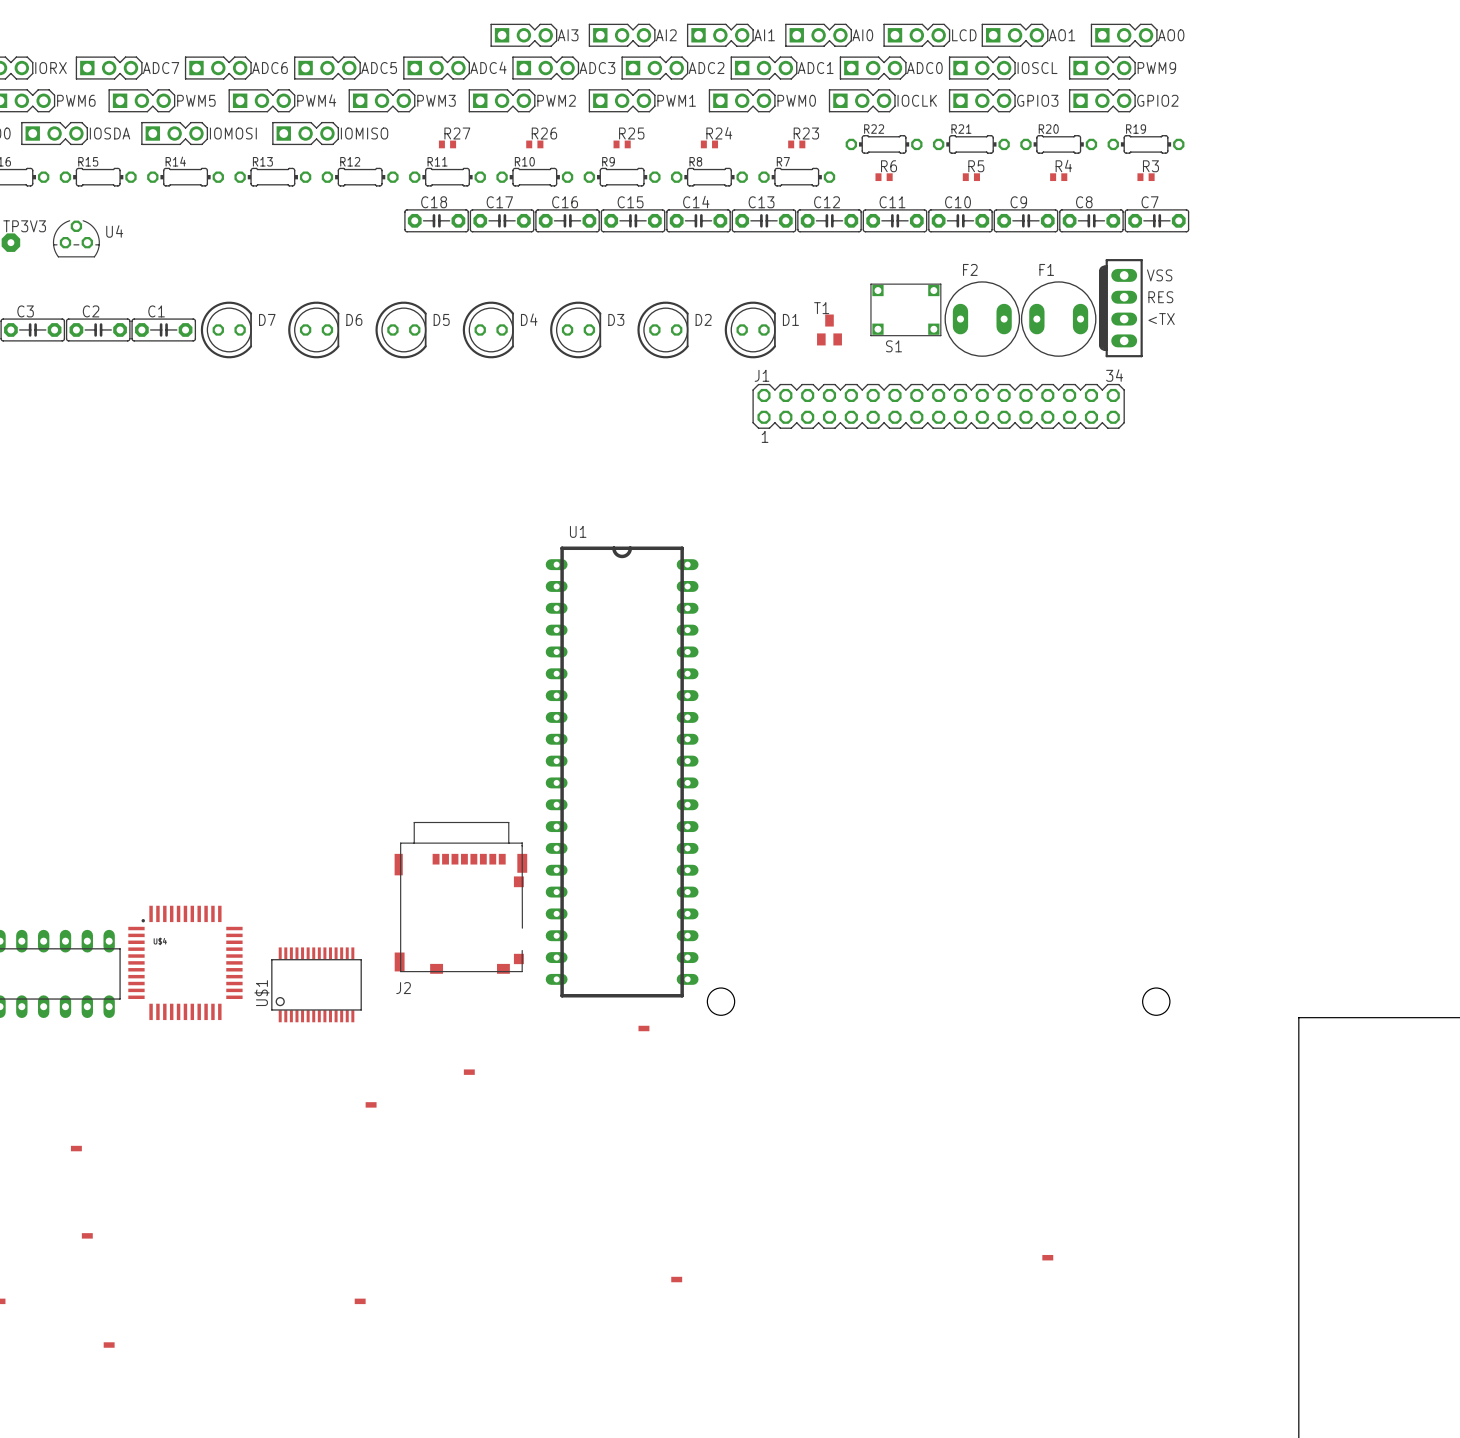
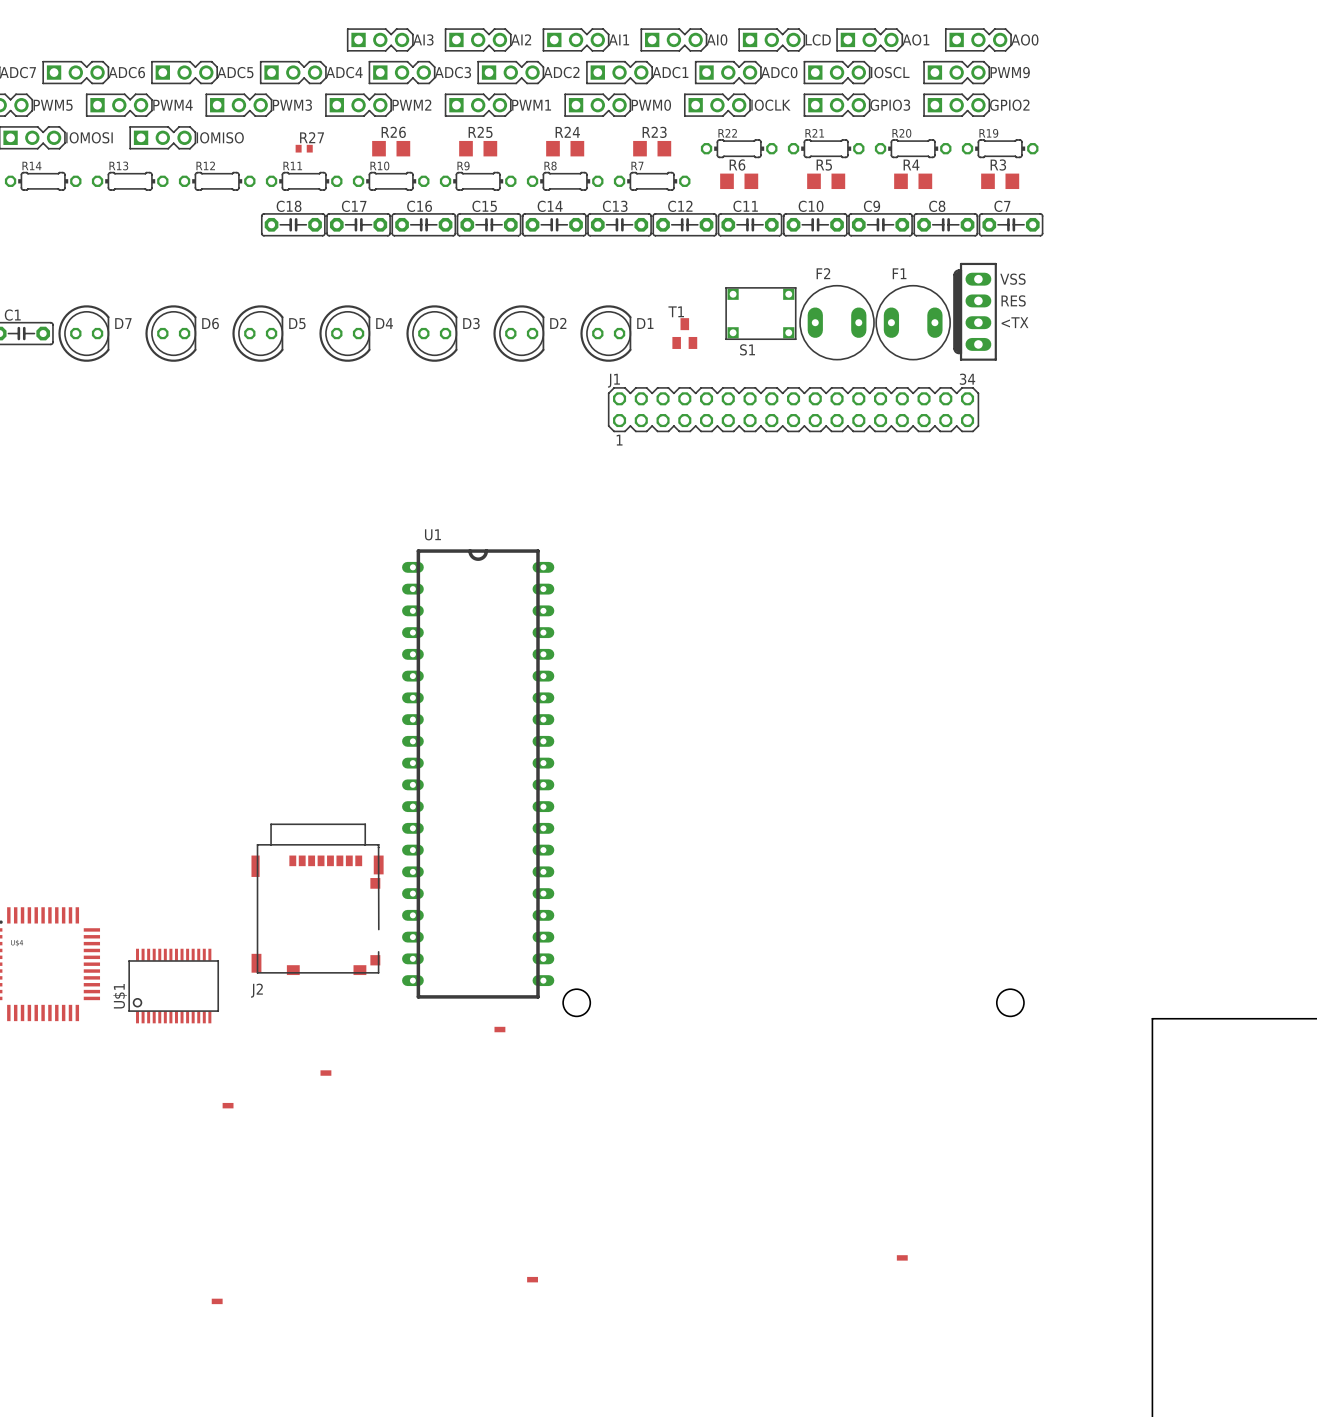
R26 footprint: [526, 140, 544, 149] -> [372, 140, 411, 157]
R25 footprint: [613, 140, 631, 149] -> [459, 140, 498, 157]
R24 footprint: [700, 140, 719, 149] -> [546, 140, 585, 157]
R23 footprint: [788, 140, 806, 149] -> [633, 140, 672, 157]
R6 footprint: [875, 173, 893, 182] -> [720, 173, 759, 190]
R5 footprint: [962, 173, 980, 182] -> [807, 173, 846, 190]
R4 footprint: [1050, 173, 1068, 182] -> [894, 173, 933, 190]
R3 footprint: [1137, 173, 1155, 182] -> [981, 173, 1020, 190]

